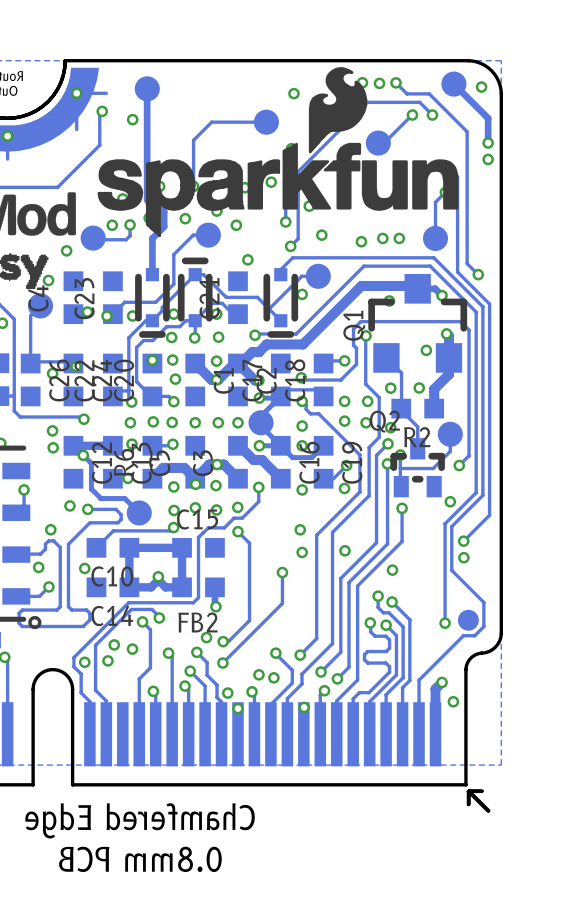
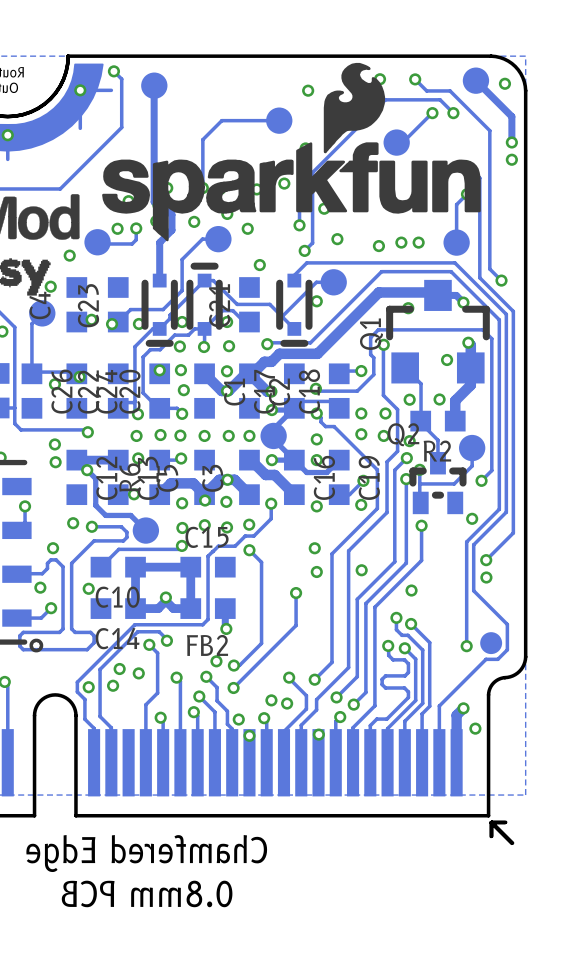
via: none -> (113, 71)
via: (379, 83) -> none
track: (102, 111) (99, 113) (99, 145) -> (113, 71) (121, 79) (121, 127) (104, 144)
via: (102, 111) -> none
via: (132, 119) -> none

